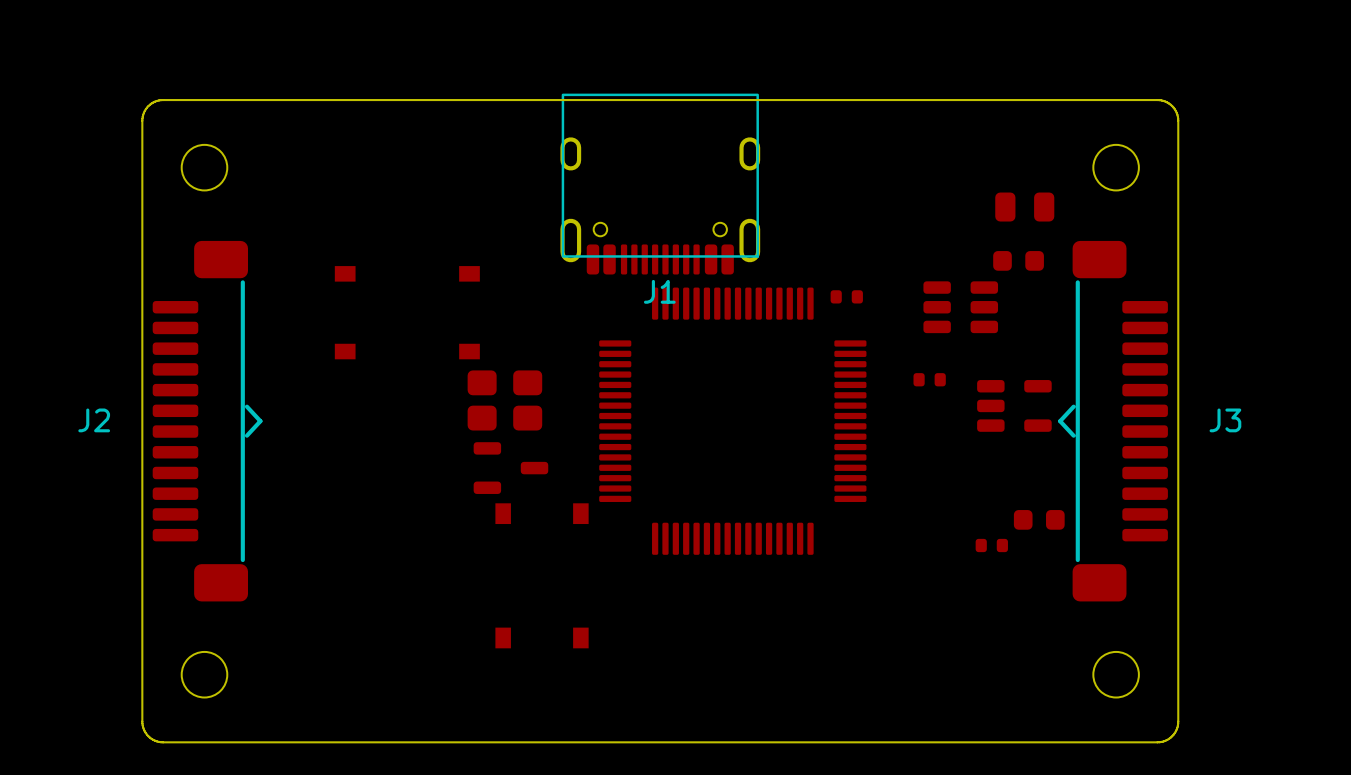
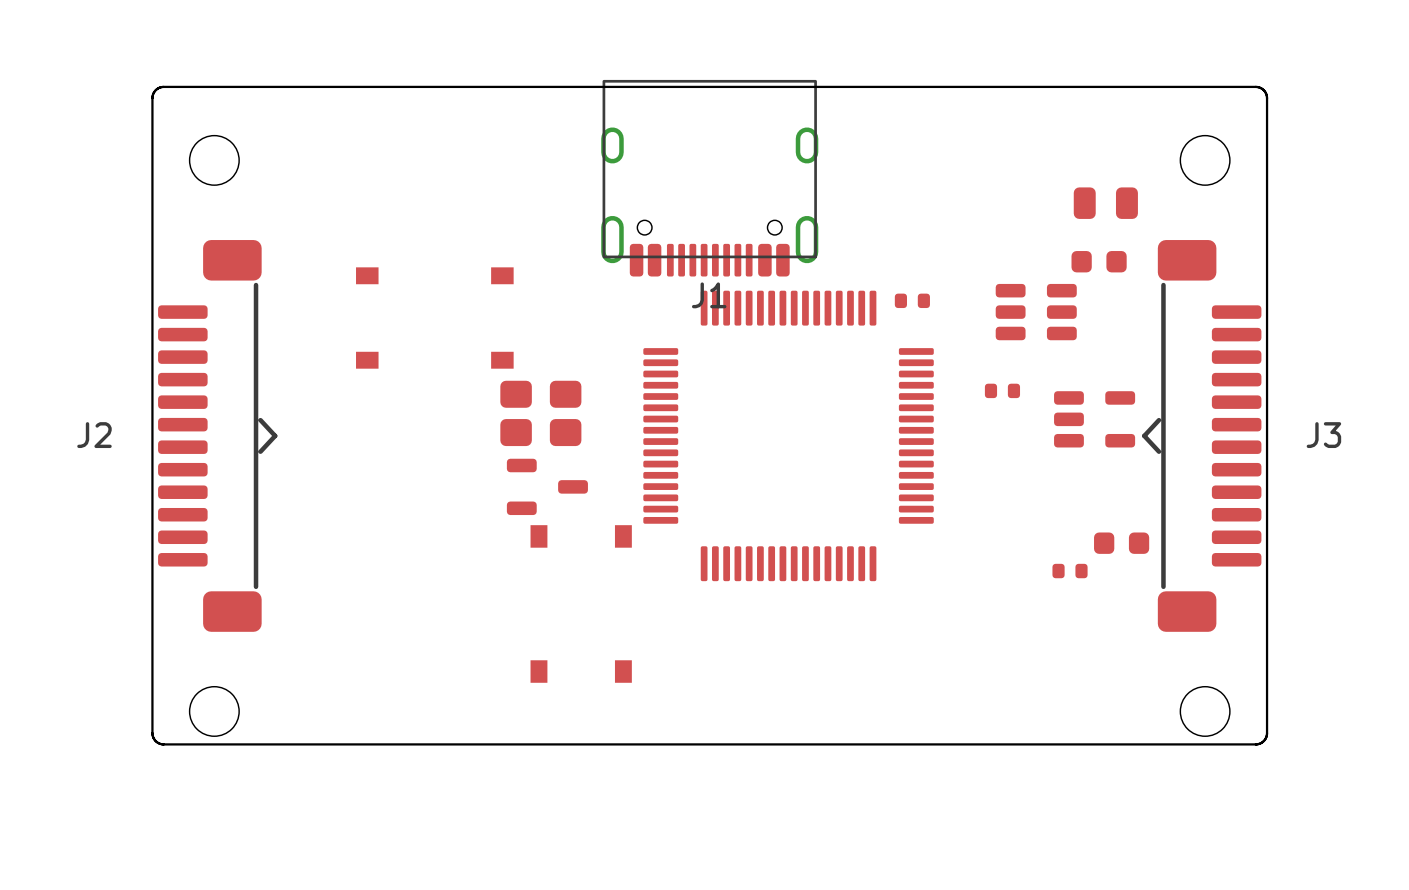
board edge: (163, 100) (155, 101) (148, 106) (143, 112) (142, 120) (142, 721) (143, 729) (148, 736) (155, 740) (163, 742) (1157, 742) (1169, 738) (1175, 731) (1178, 721) (1178, 120) (1176, 112) (1172, 106) (1165, 101) (1157, 100) -> (169, 86) (157, 88) (152, 98) (152, 733) (155, 741) (163, 744) (1255, 744) (1262, 742) (1267, 733) (1267, 98) (1262, 88) (1250, 86)

